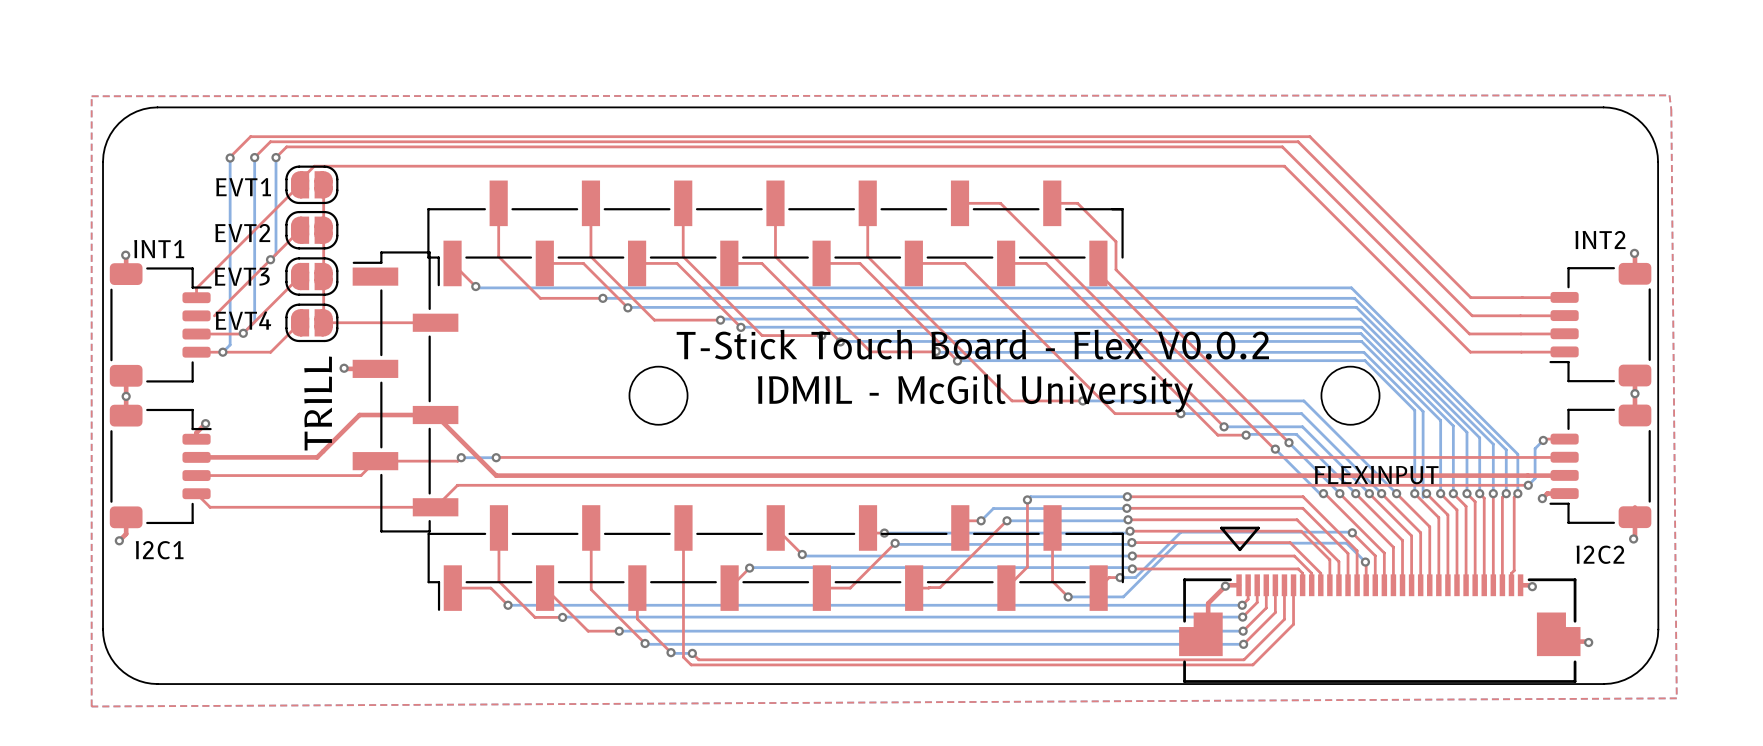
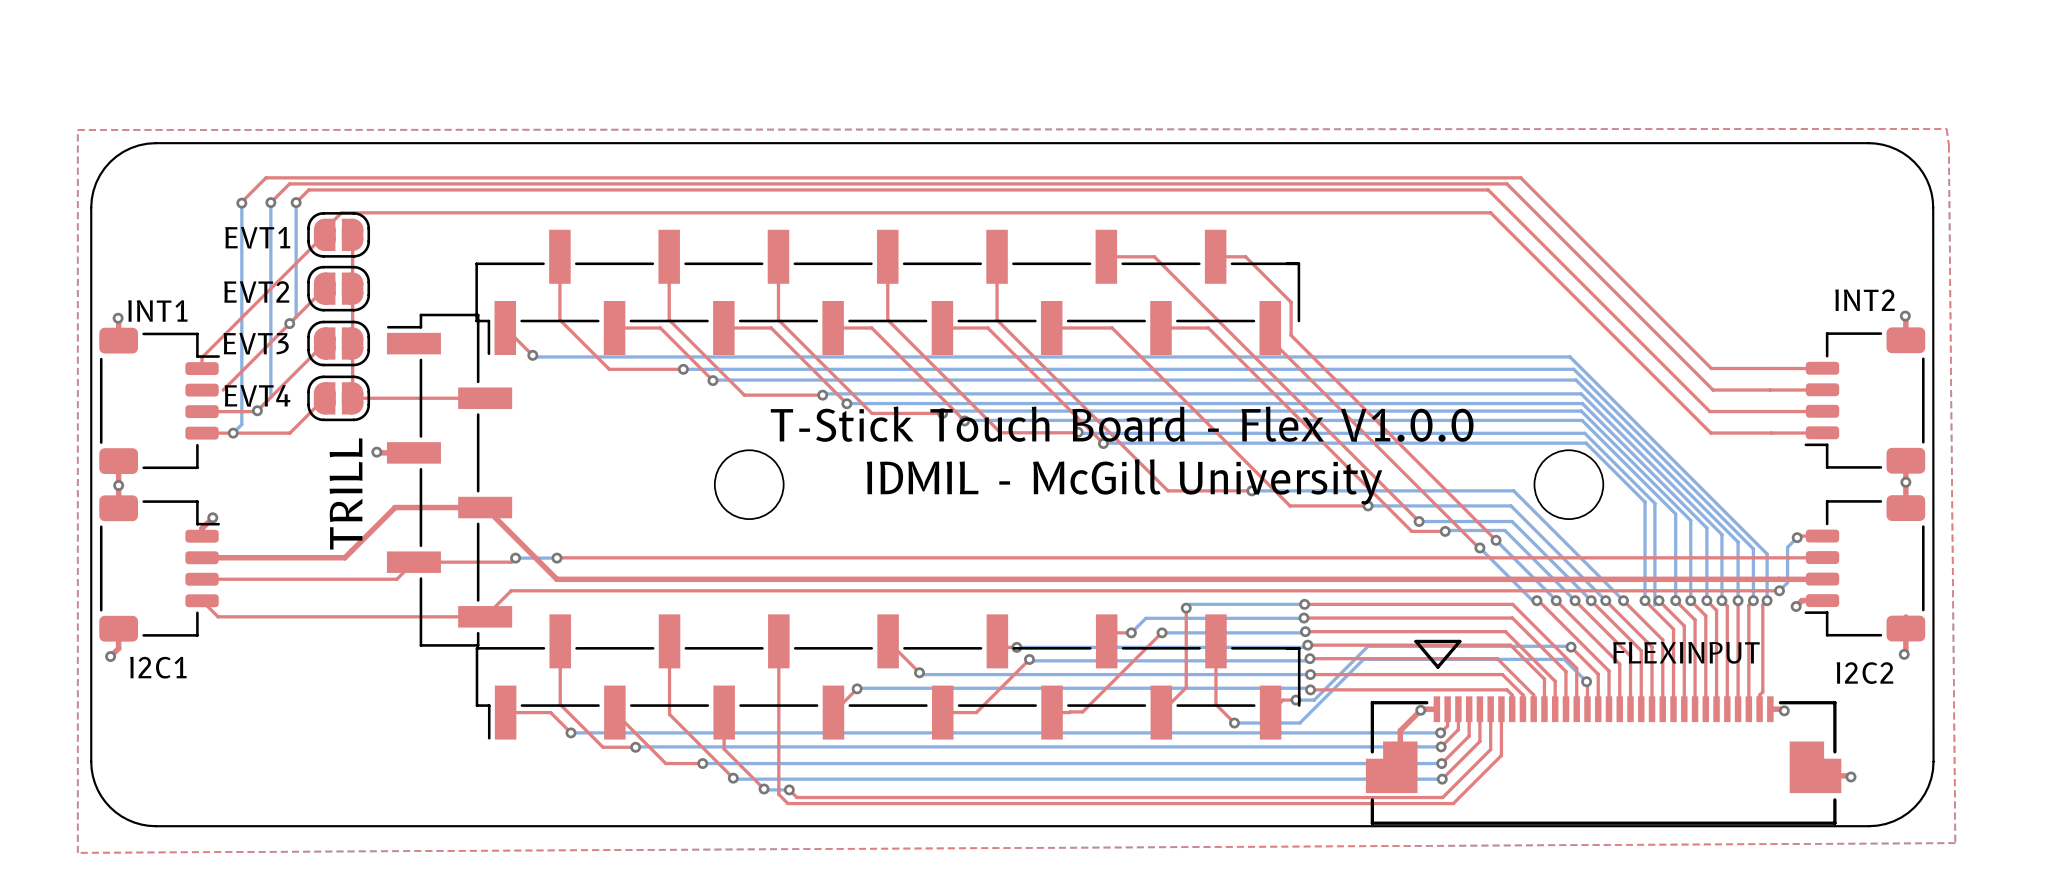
text: T-Stick Touch Board - Flex V0.0.2 (972, 344) -> T-Stick Touch Board - Flex V1.0.0 (1122, 424)
text position: FLEXINPUT (1376, 475) -> FLEXINPUT (1686, 652)

